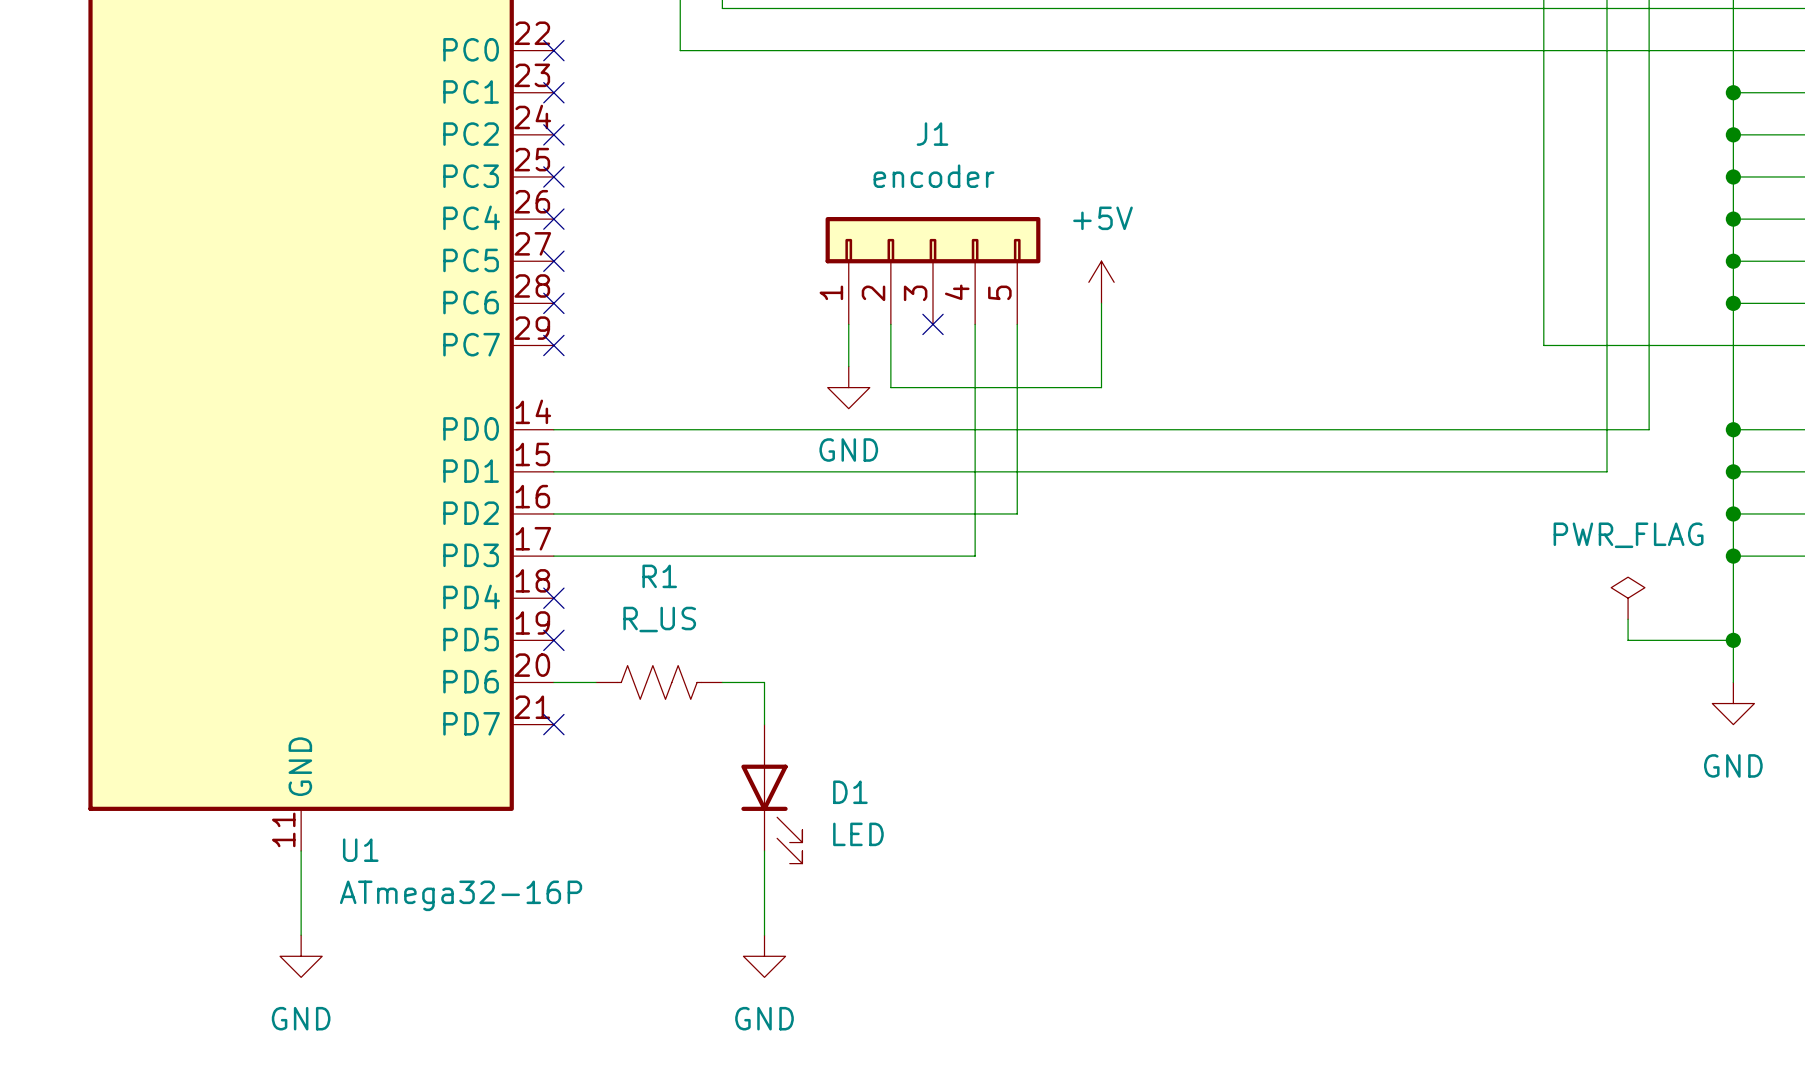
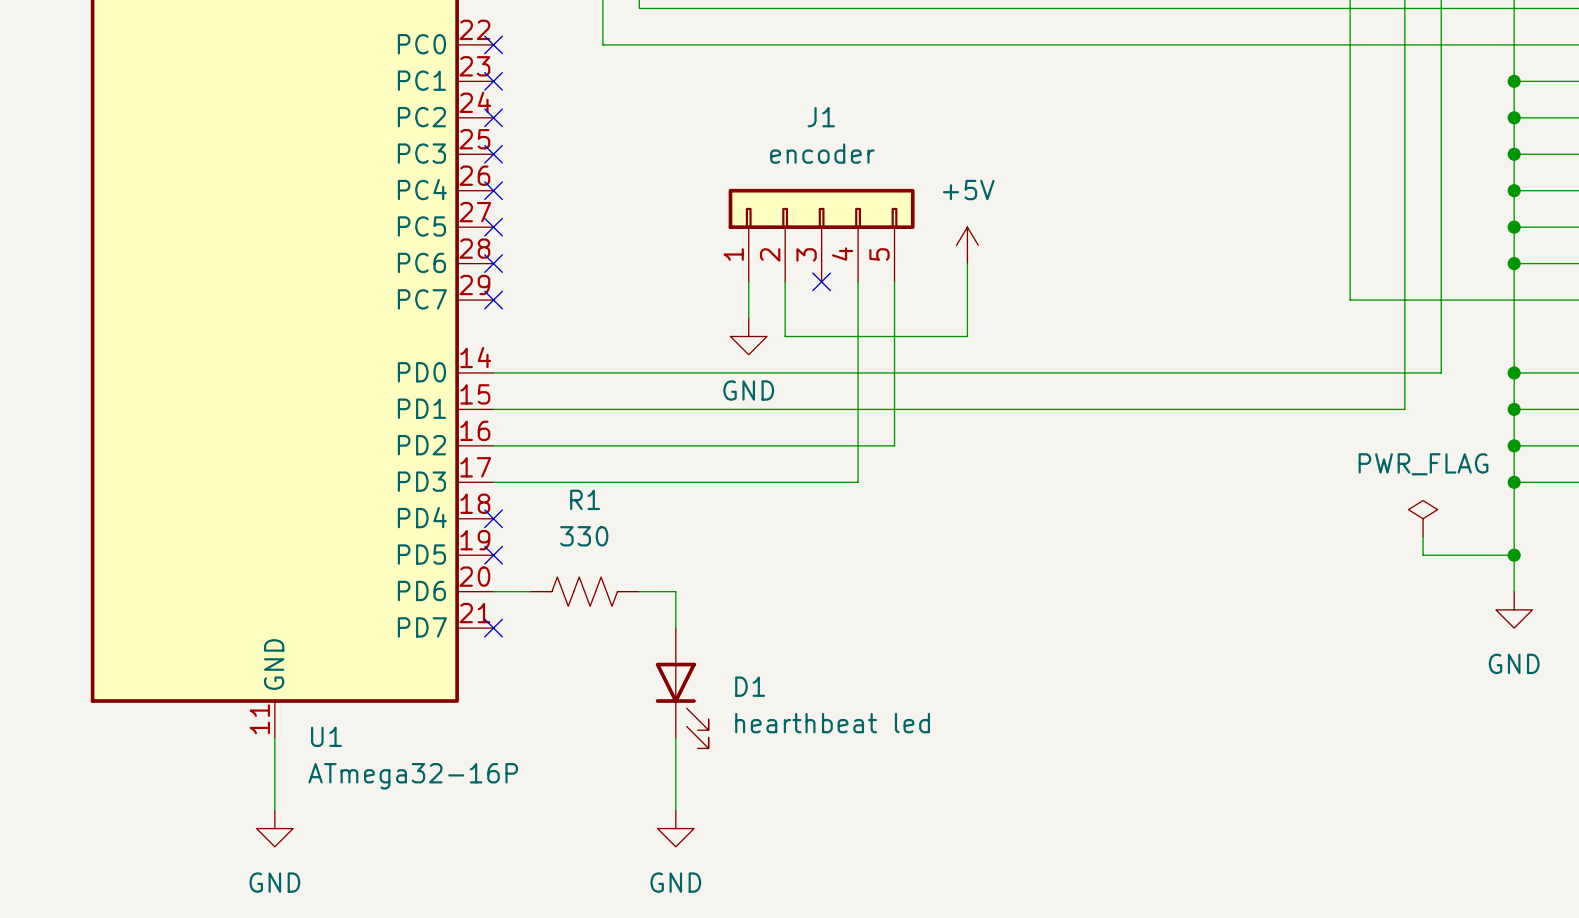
R1 value: R_US (659, 619) -> 330 (584, 536)
D1 value: LED (858, 834) -> hearthbeat led (832, 723)

